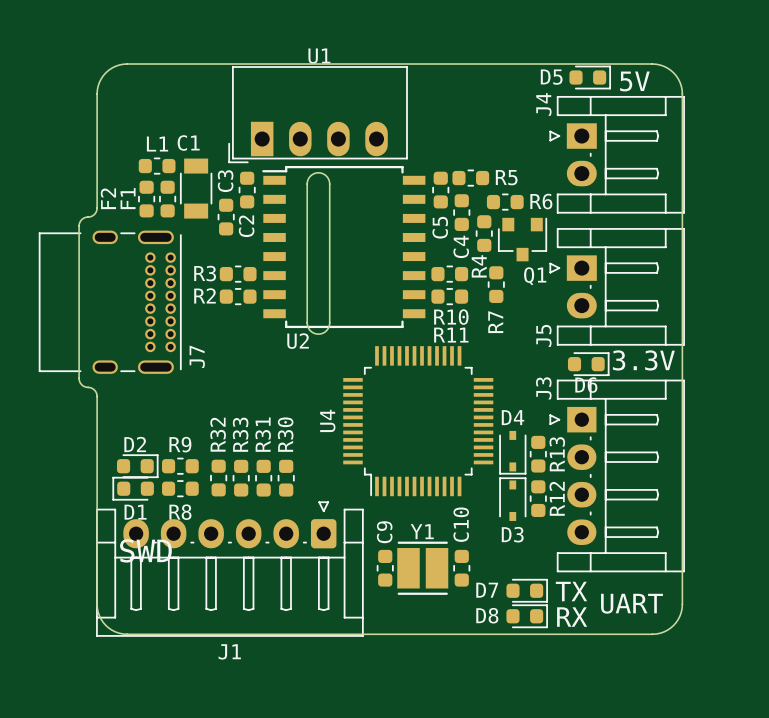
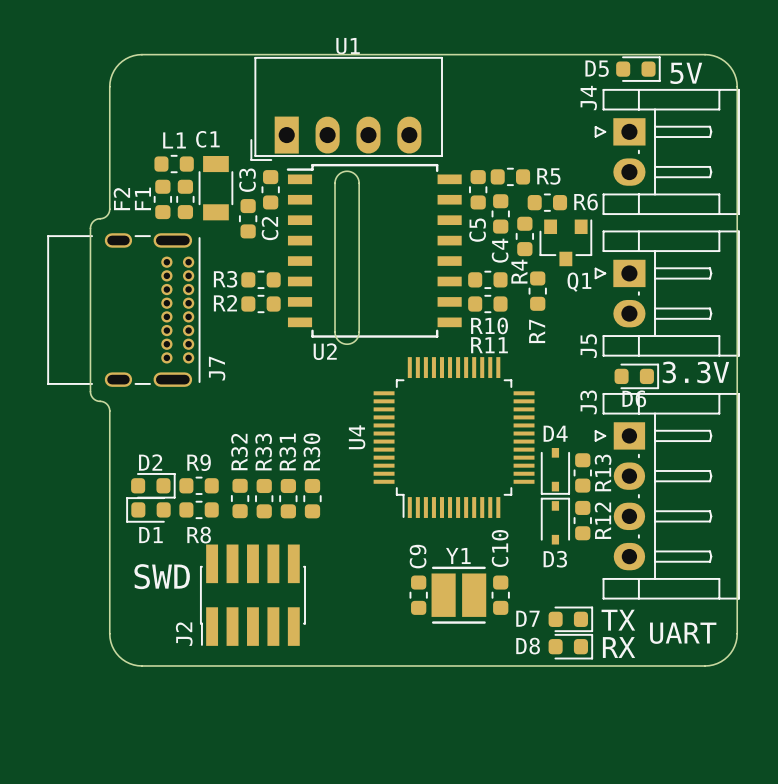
J2: none -> (252, 595)
J1: (229, 569) -> none

